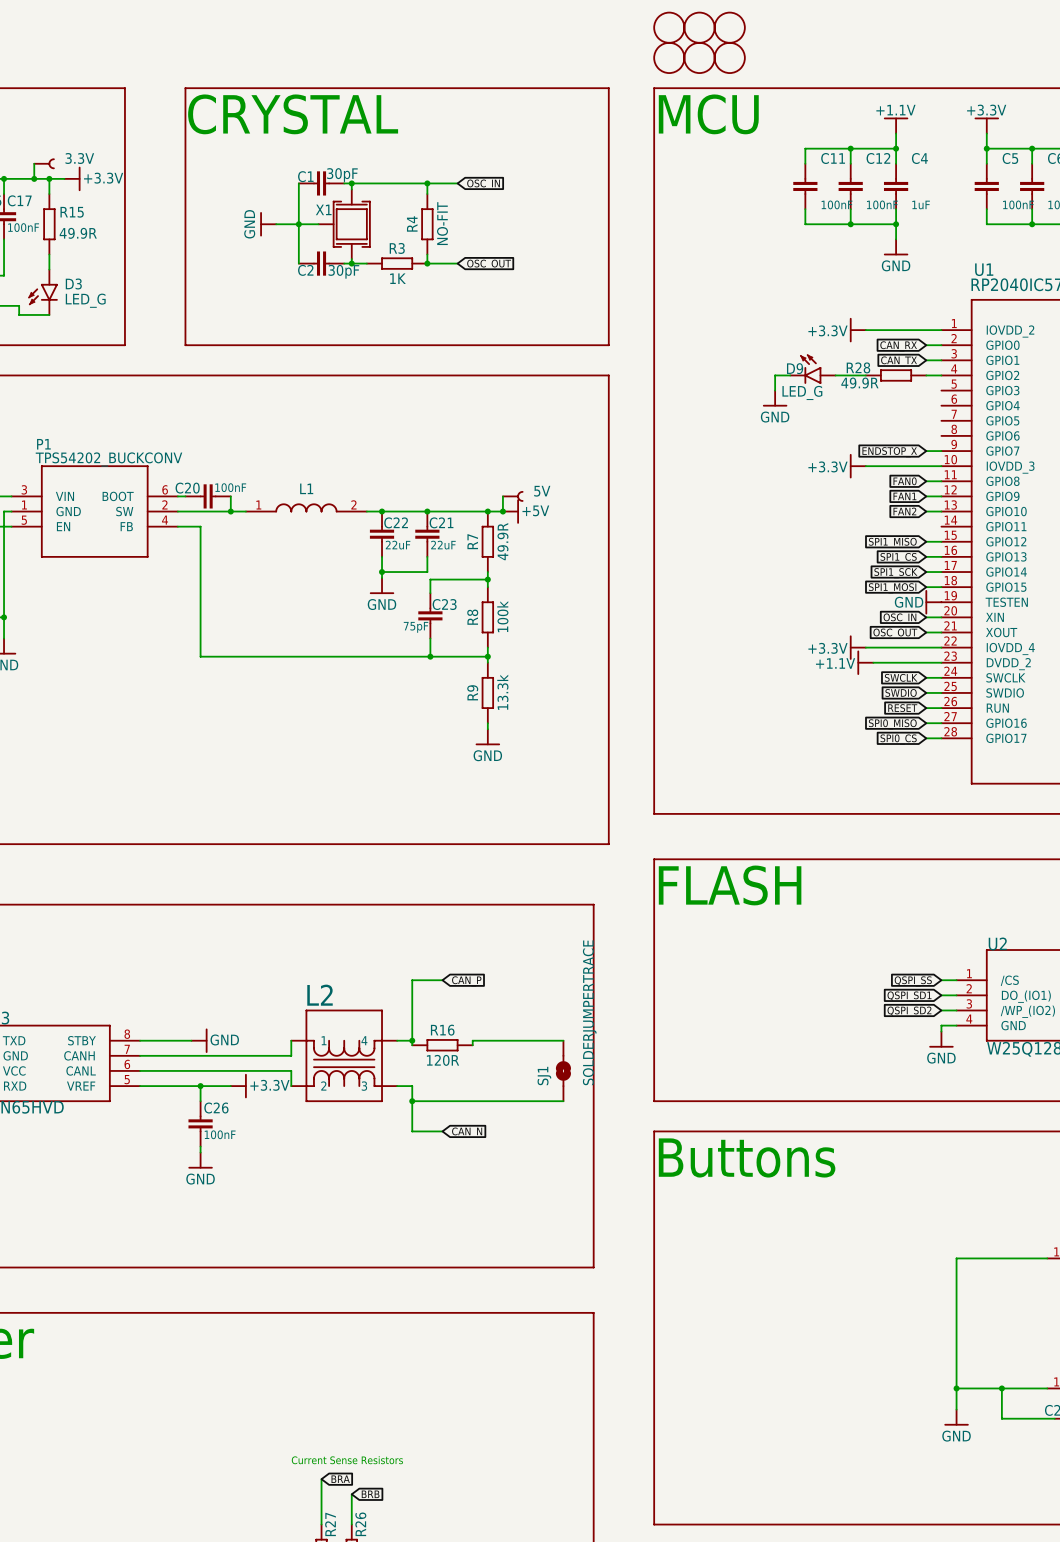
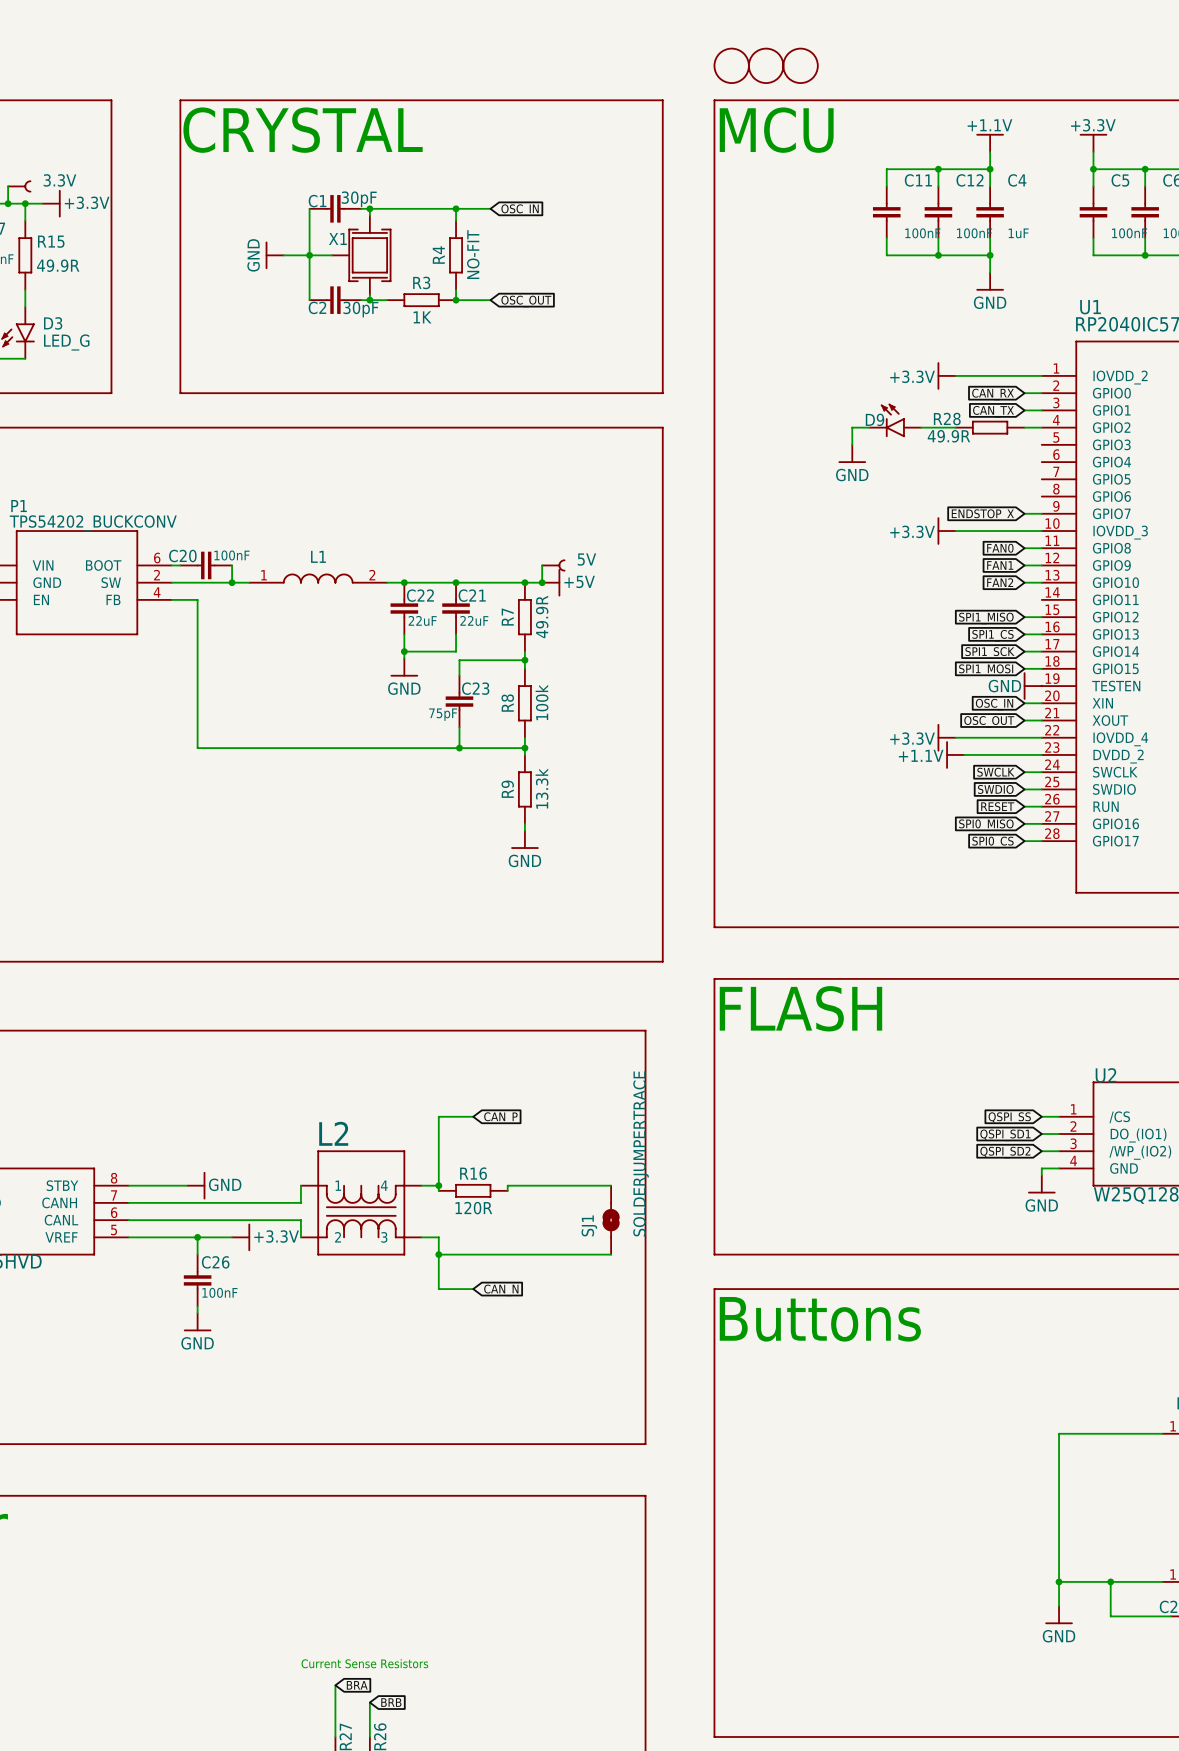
part: (669, 27) -> none
part: (699, 27) -> none
part: (729, 27) -> none
D9 value: LED_G (802, 392) -> none

